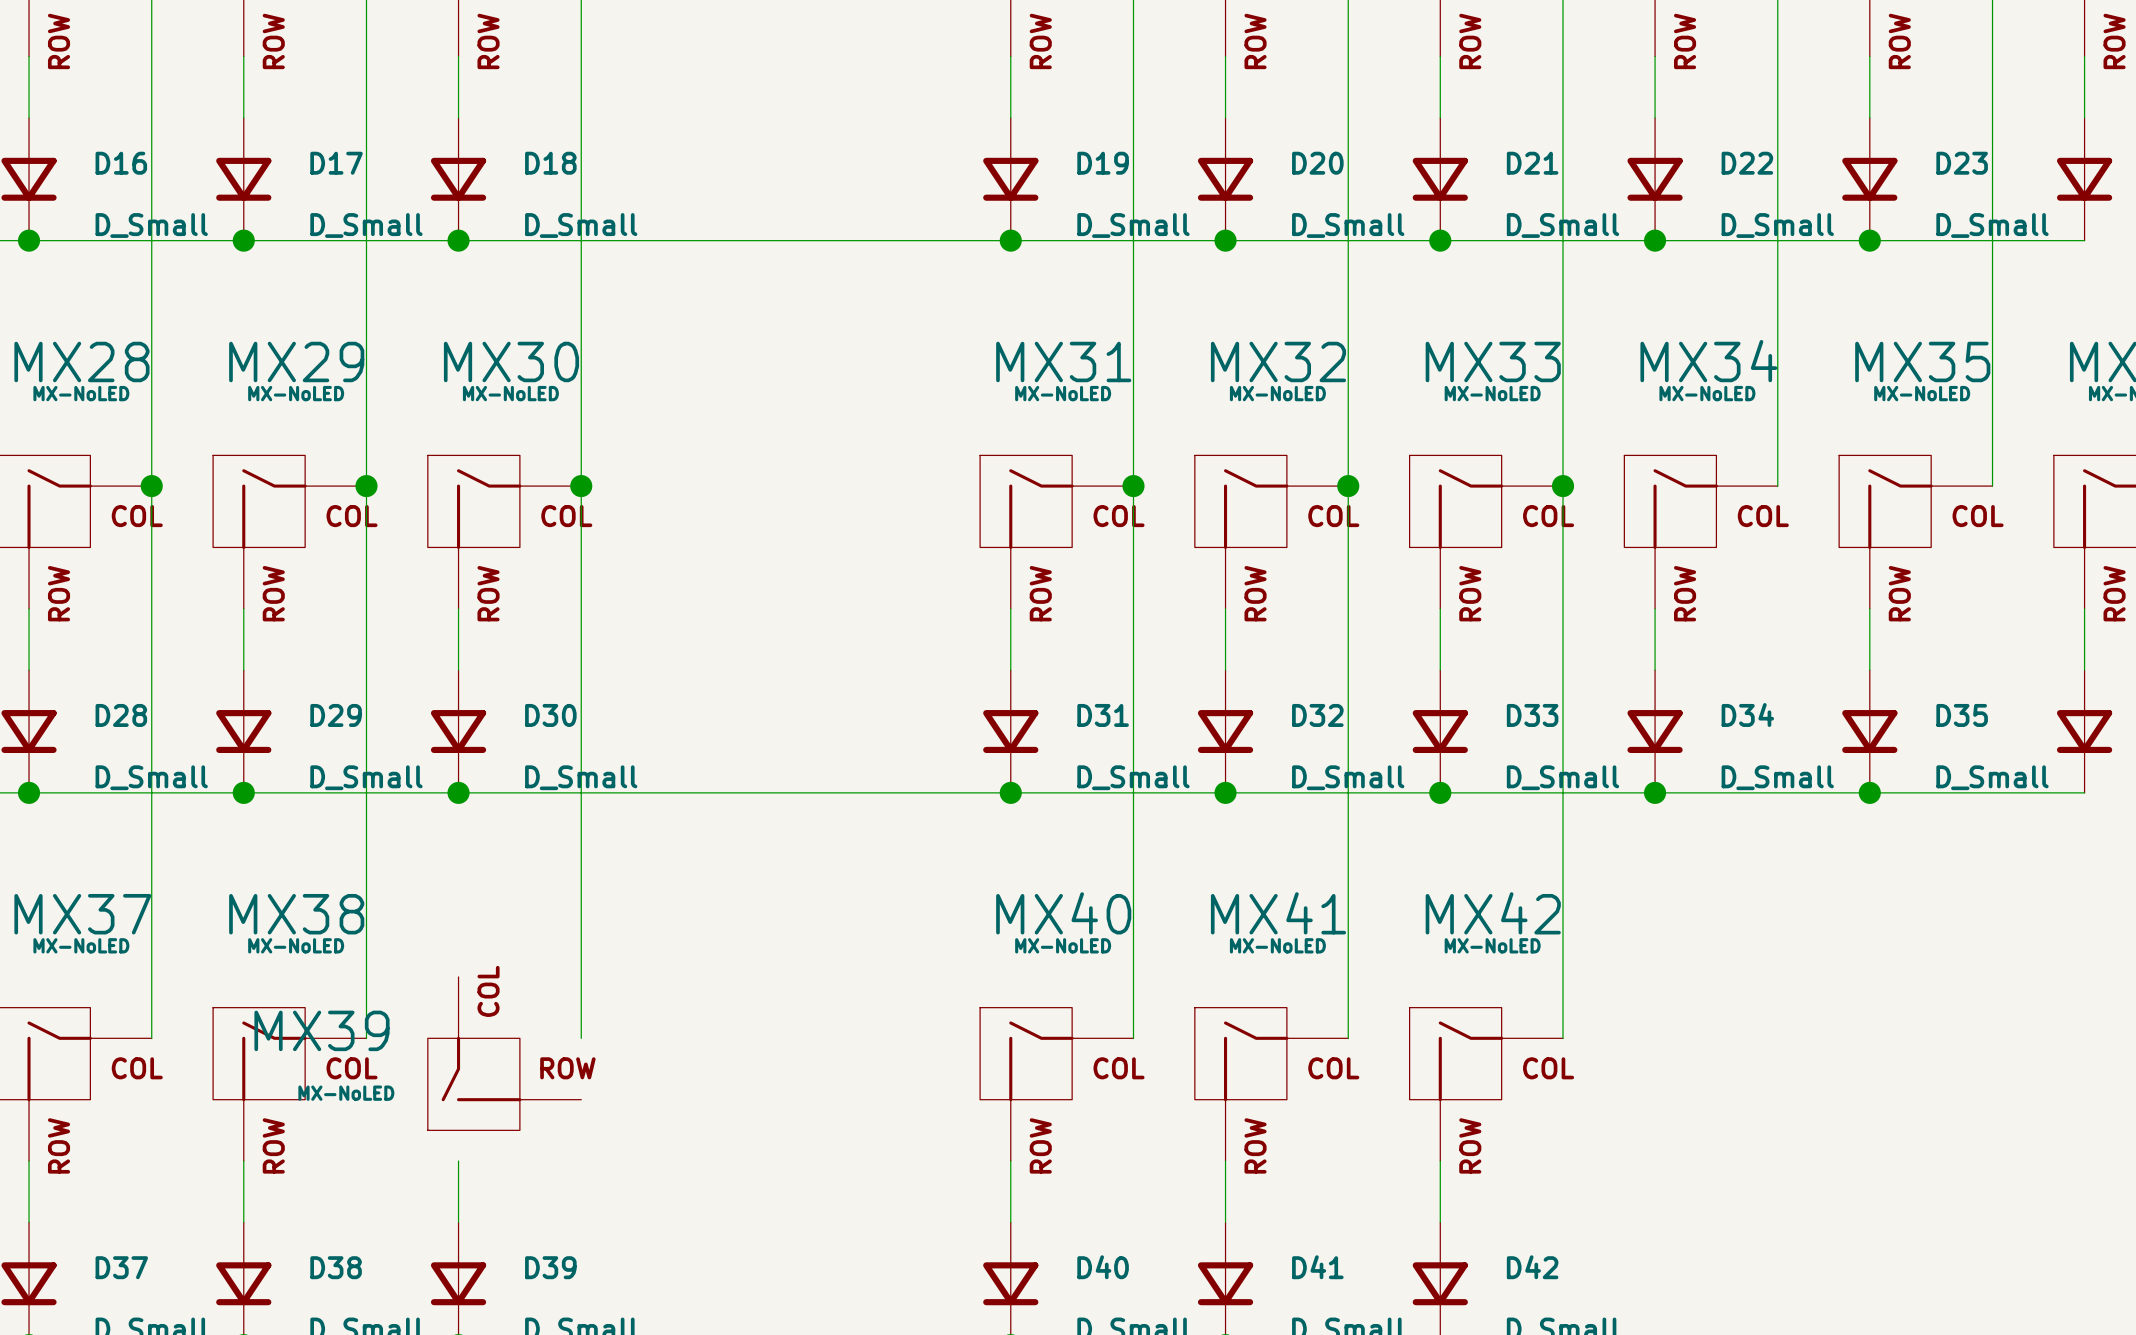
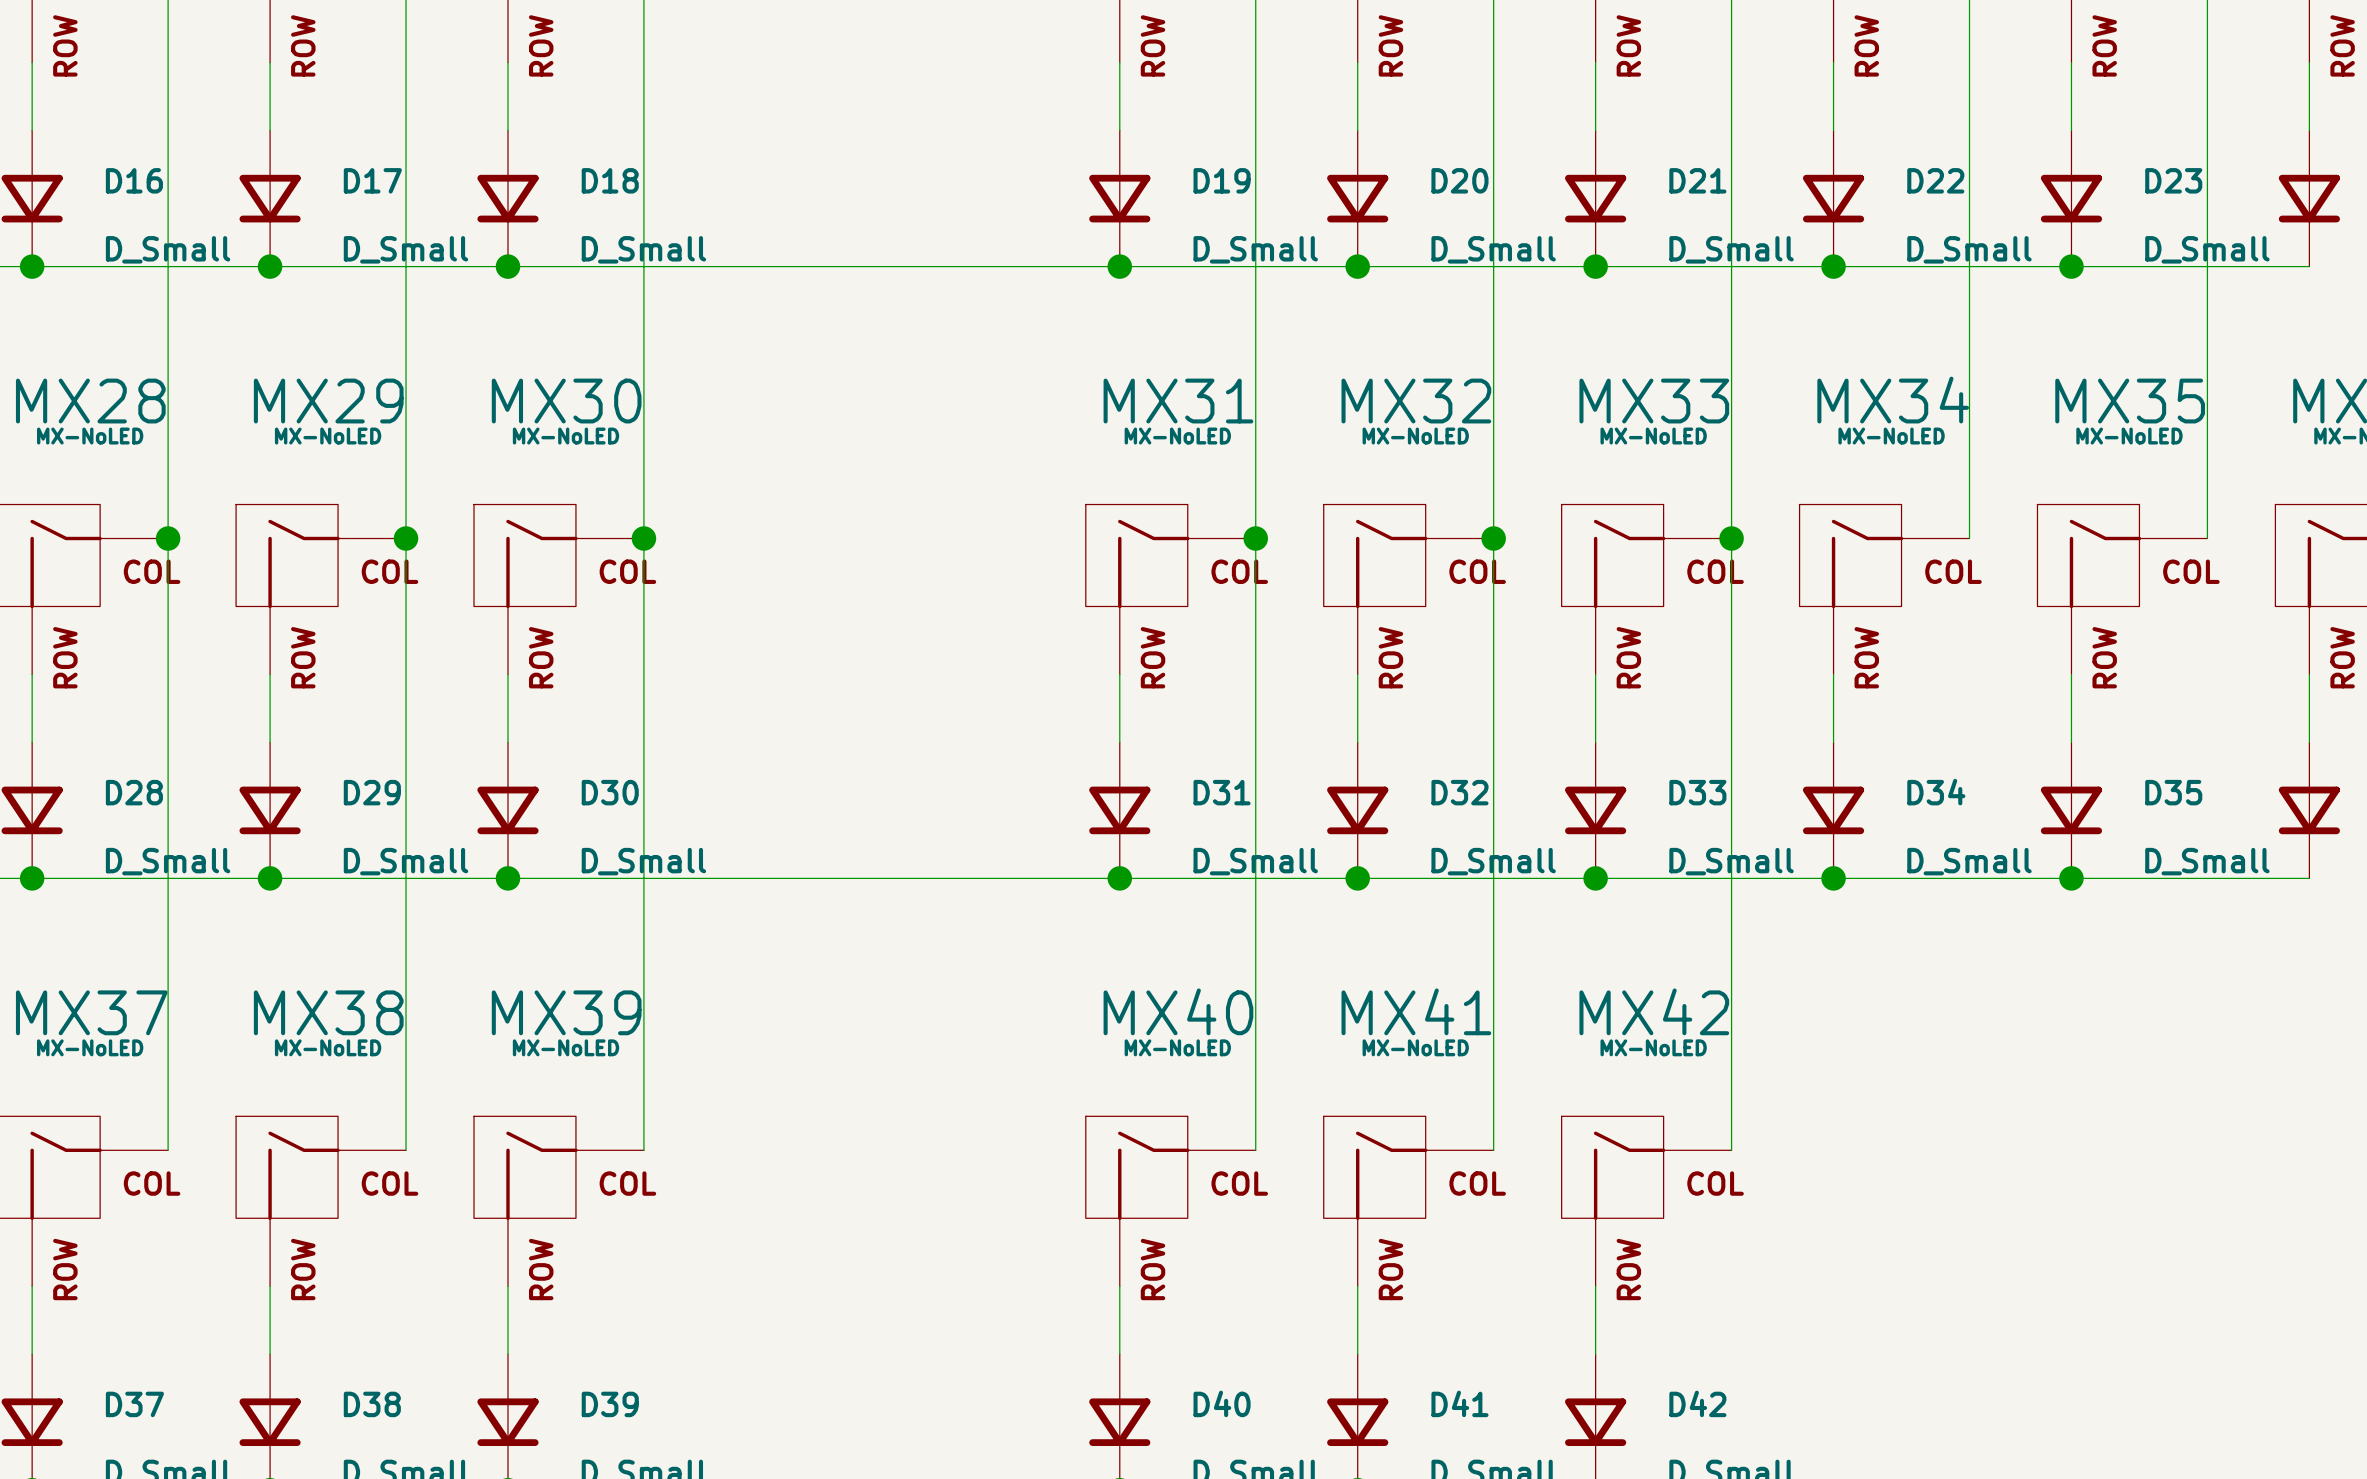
MX39 rotation: 0° (474, 1083) -> 90° clockwise (525, 1168)
MX39 value position: MX-NoLED (346, 1093) -> MX-NoLED (566, 1047)

